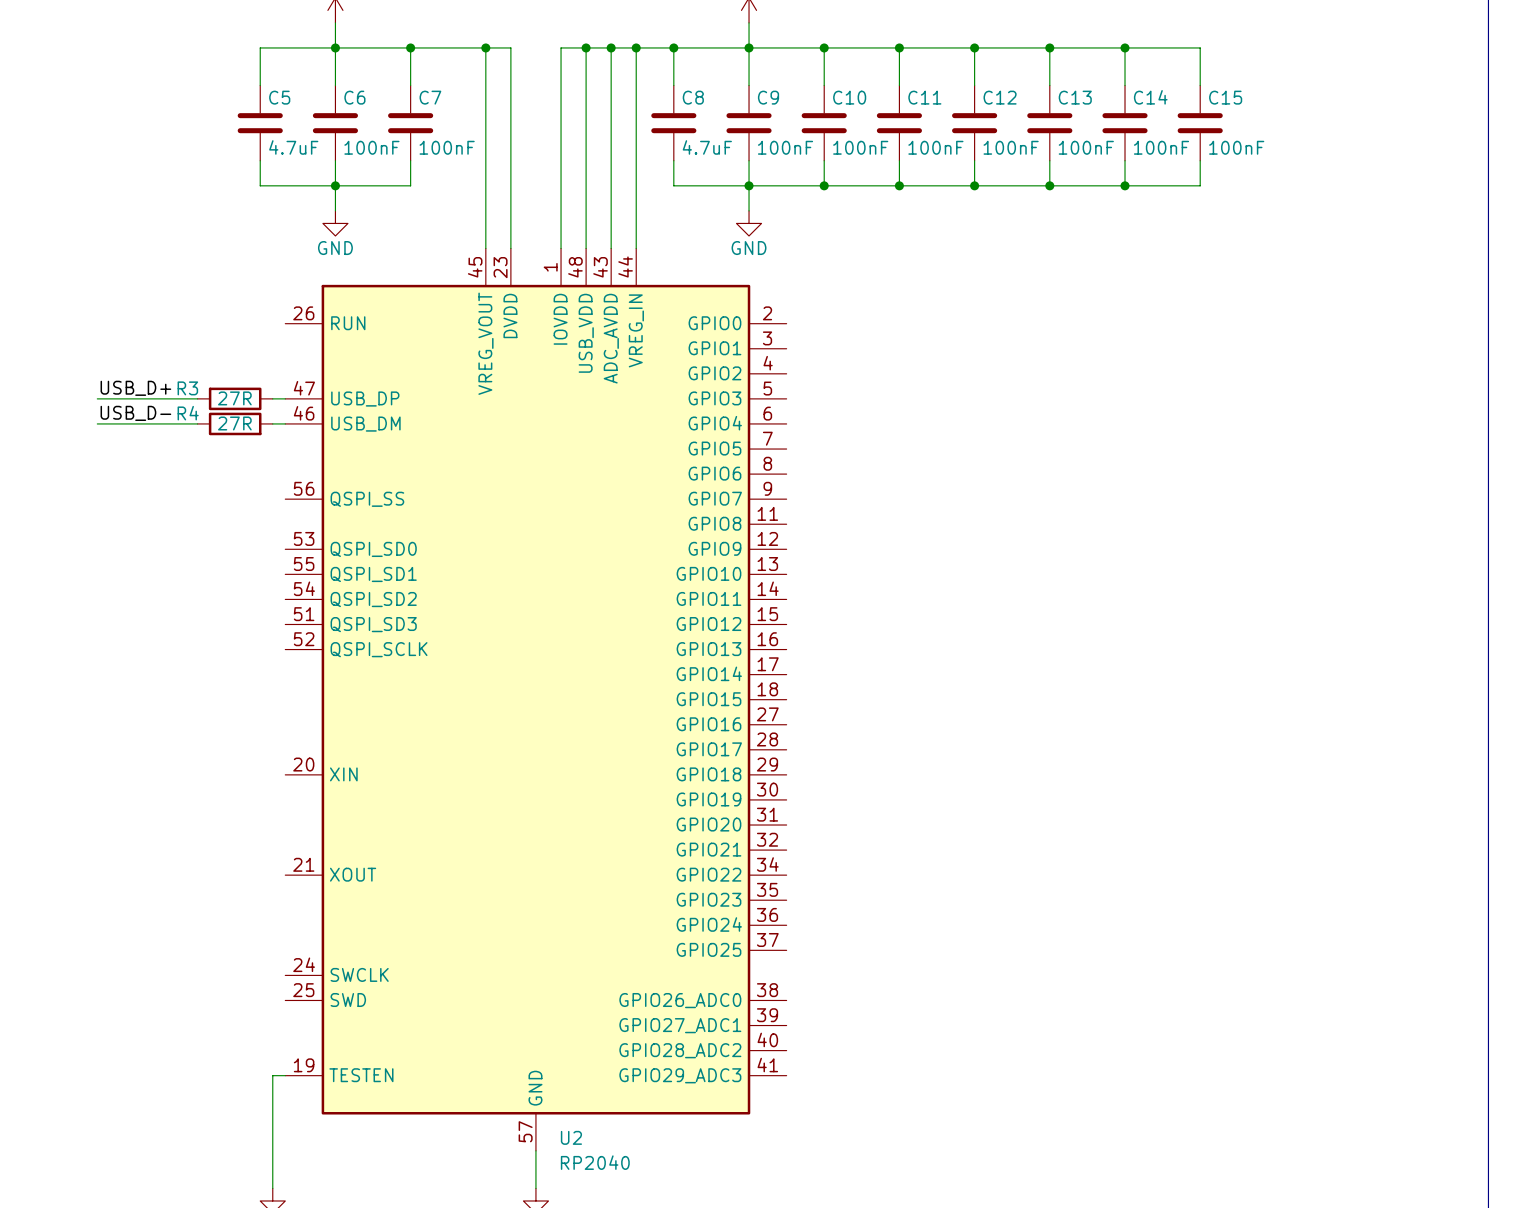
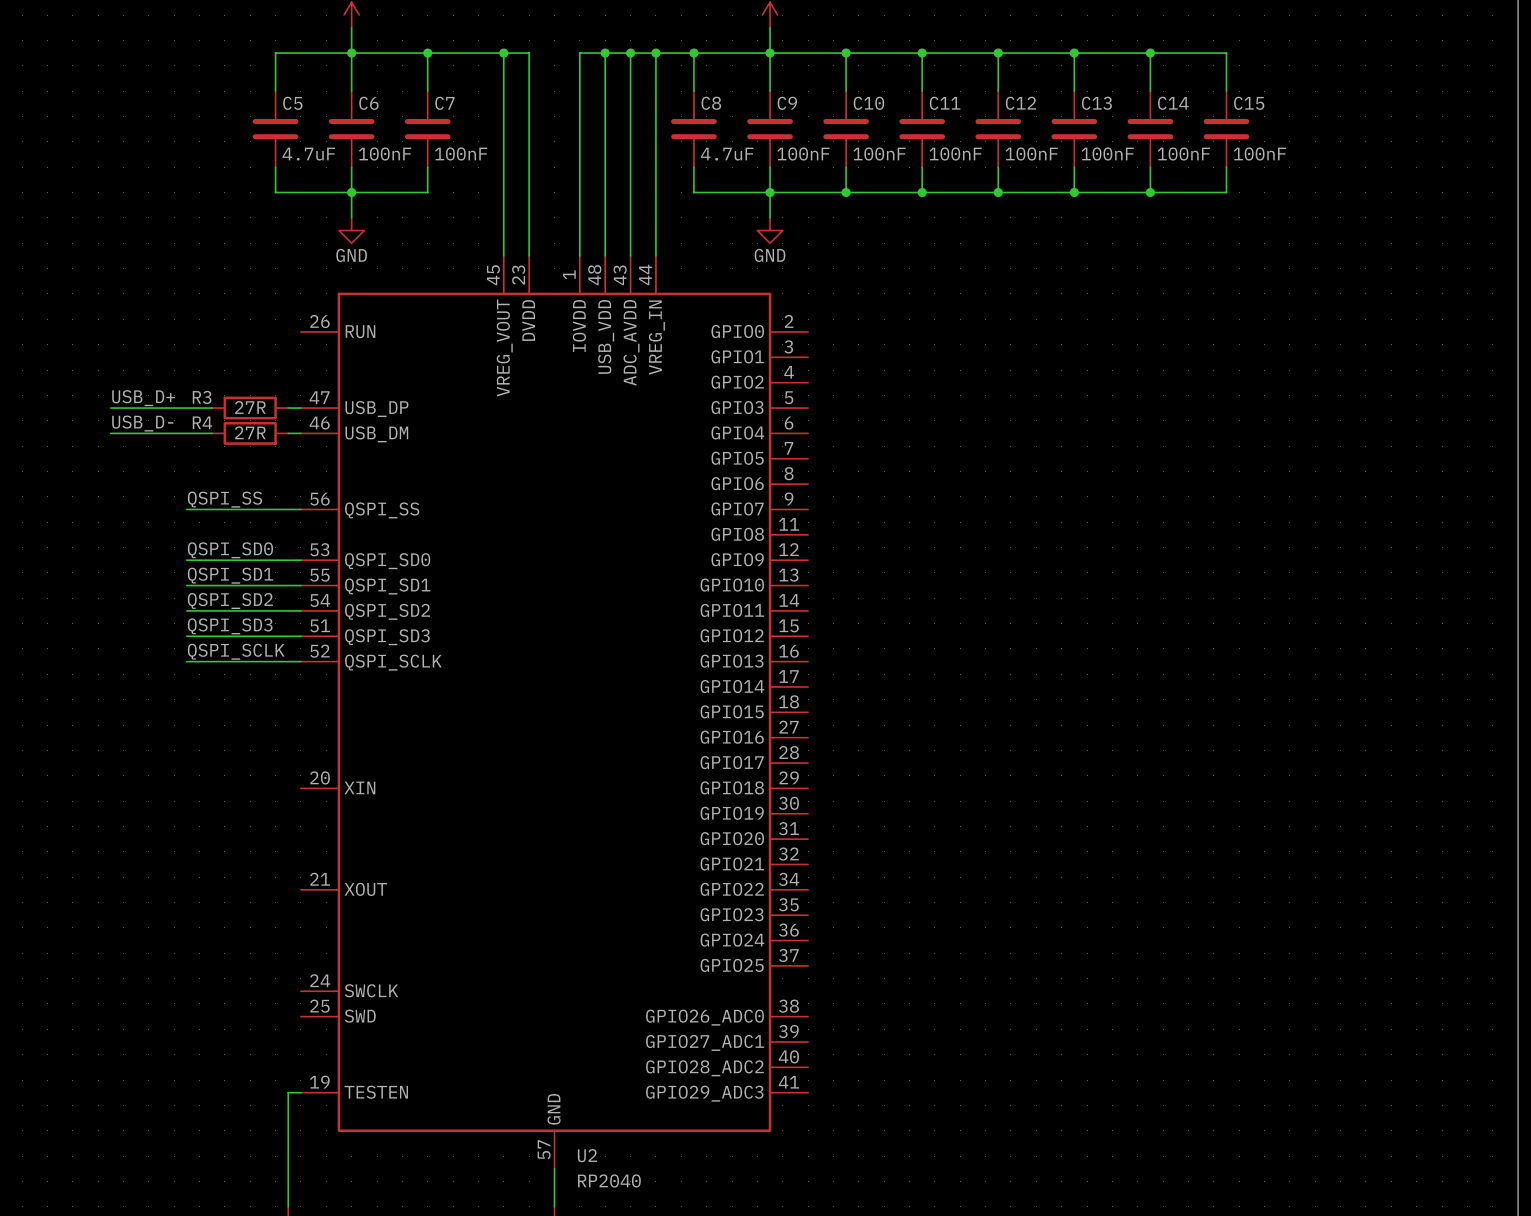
label: none -> QSPI_SS (224, 499)
wire: none -> (186, 509) (300, 509)
label: none -> QSPI_SD0 (230, 550)
wire: none -> (186, 560) (300, 560)
label: none -> QSPI_SD1 (230, 575)
wire: none -> (186, 585) (300, 585)
label: none -> QSPI_SD2 (230, 601)
wire: none -> (186, 610) (300, 610)
label: none -> QSPI_SD3 (230, 626)
wire: none -> (186, 636) (300, 636)
label: none -> QSPI_SCLK (236, 651)
wire: none -> (186, 661) (300, 661)

